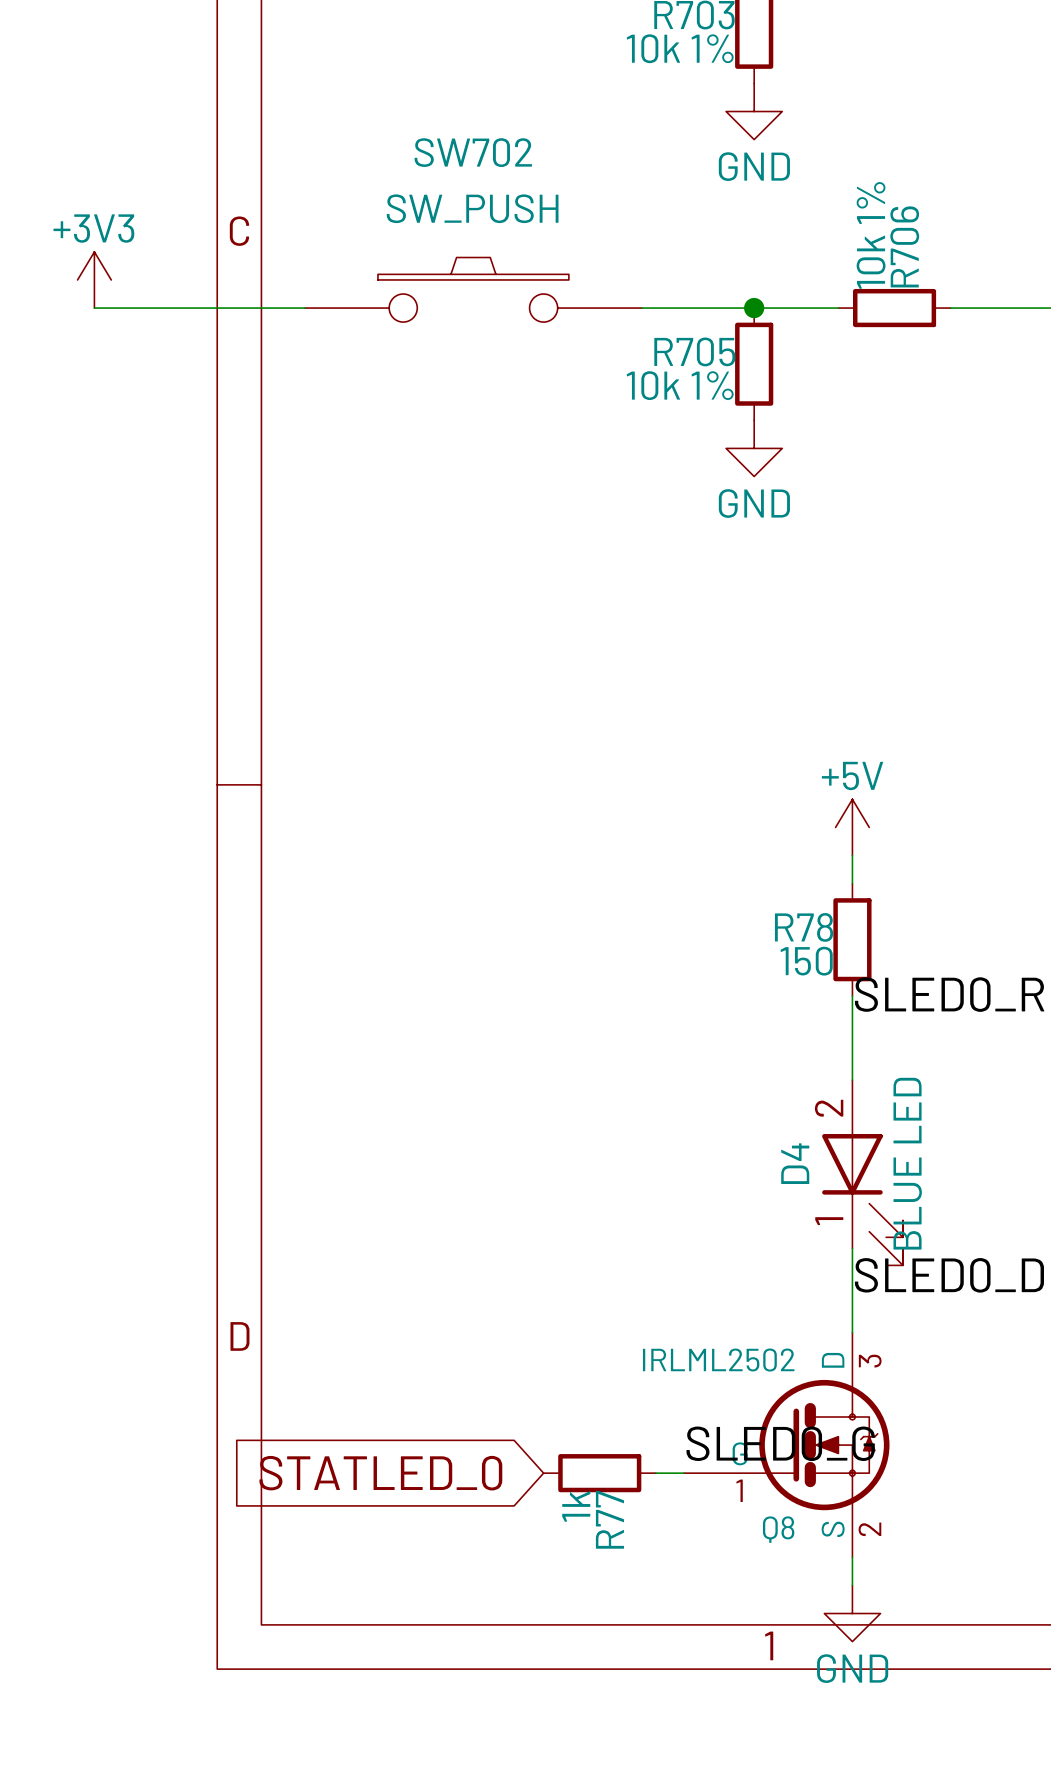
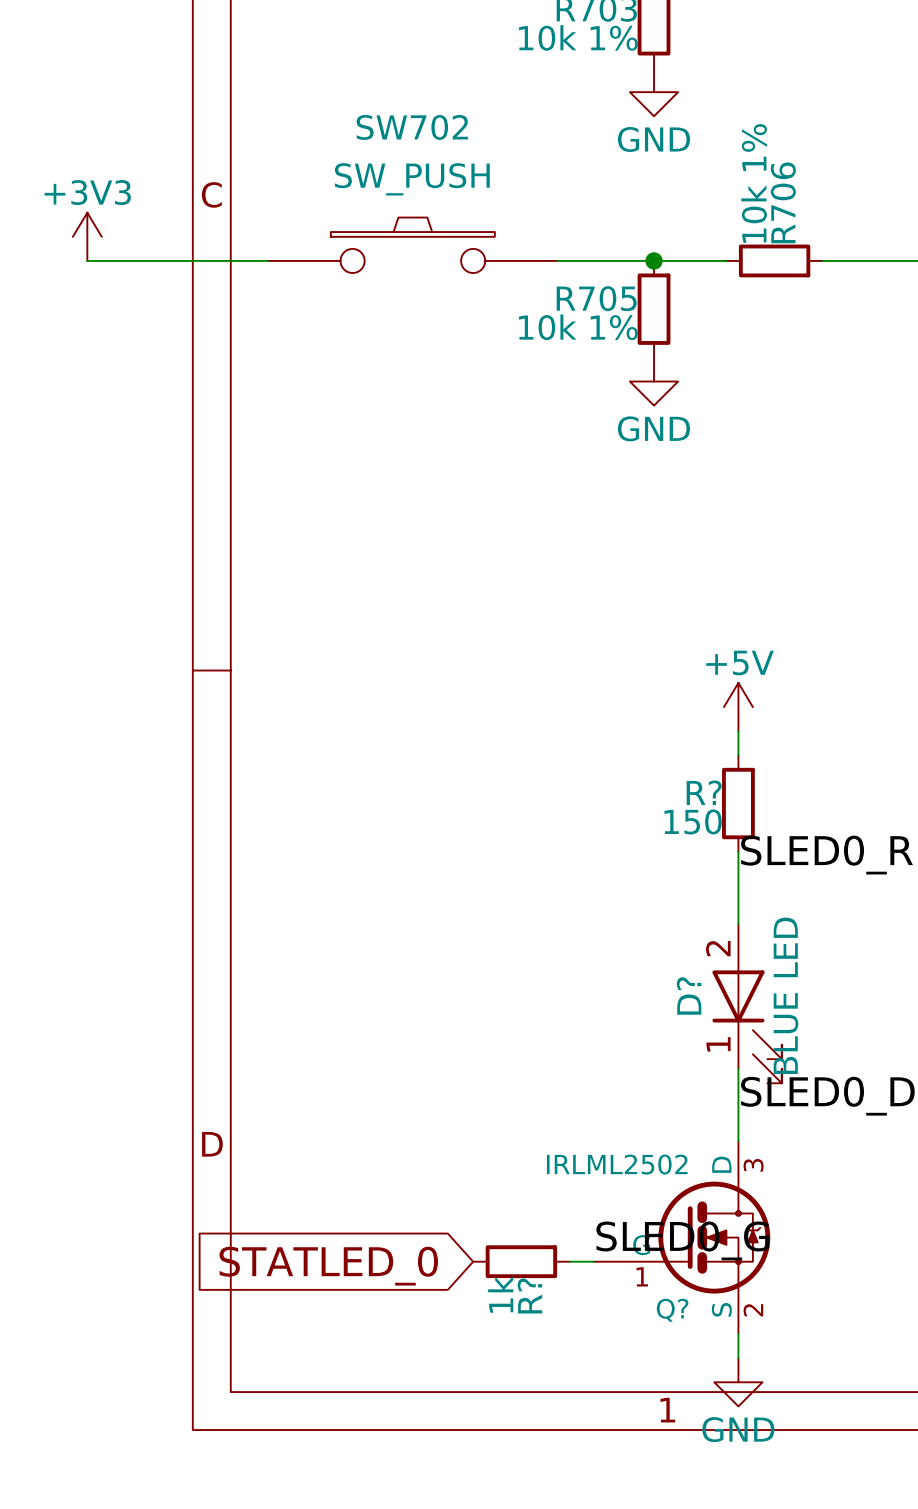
R78 name: R78 (804, 927) -> R? (704, 792)
D4 name: D4 (795, 1163) -> D? (689, 995)
R77 name: R77 (609, 1519) -> R? (529, 1295)
Q8 name: Q8 (778, 1529) -> Q? (672, 1310)

